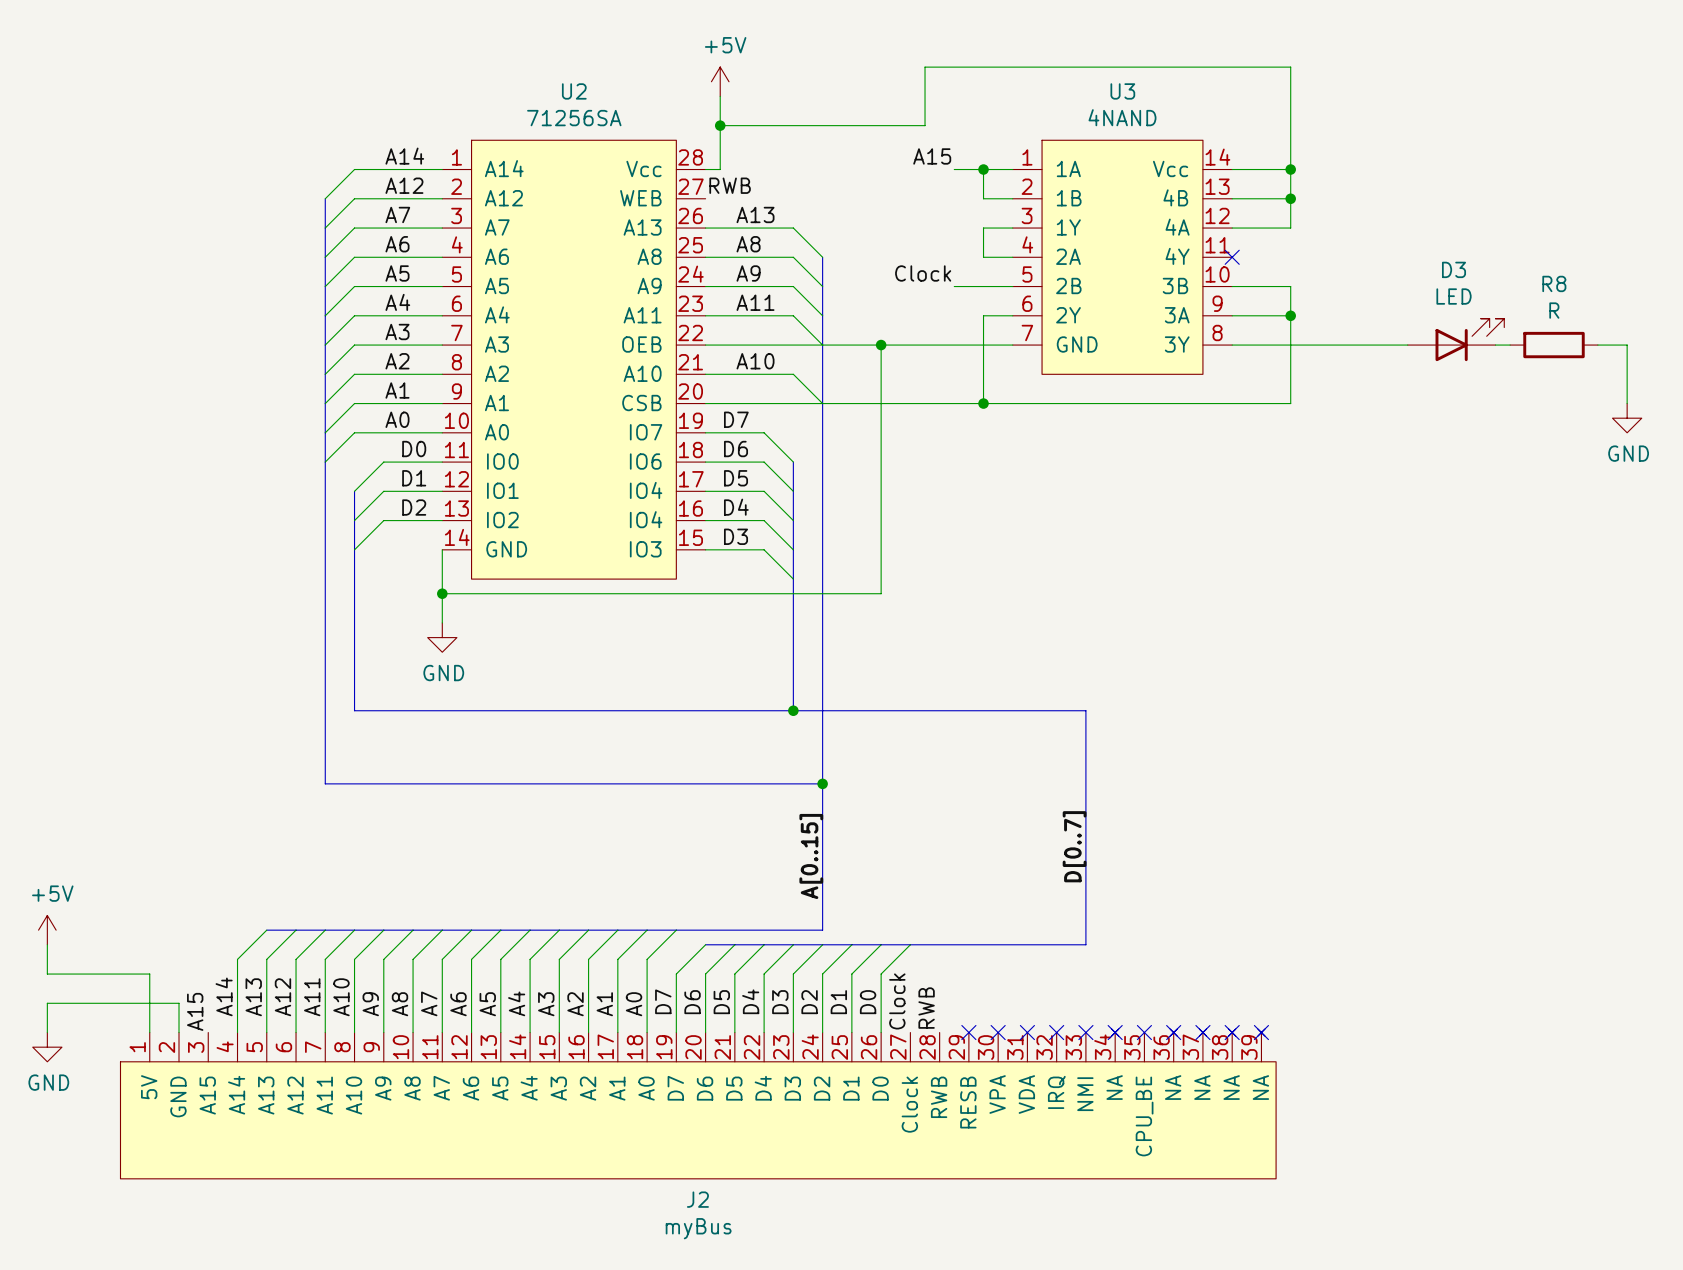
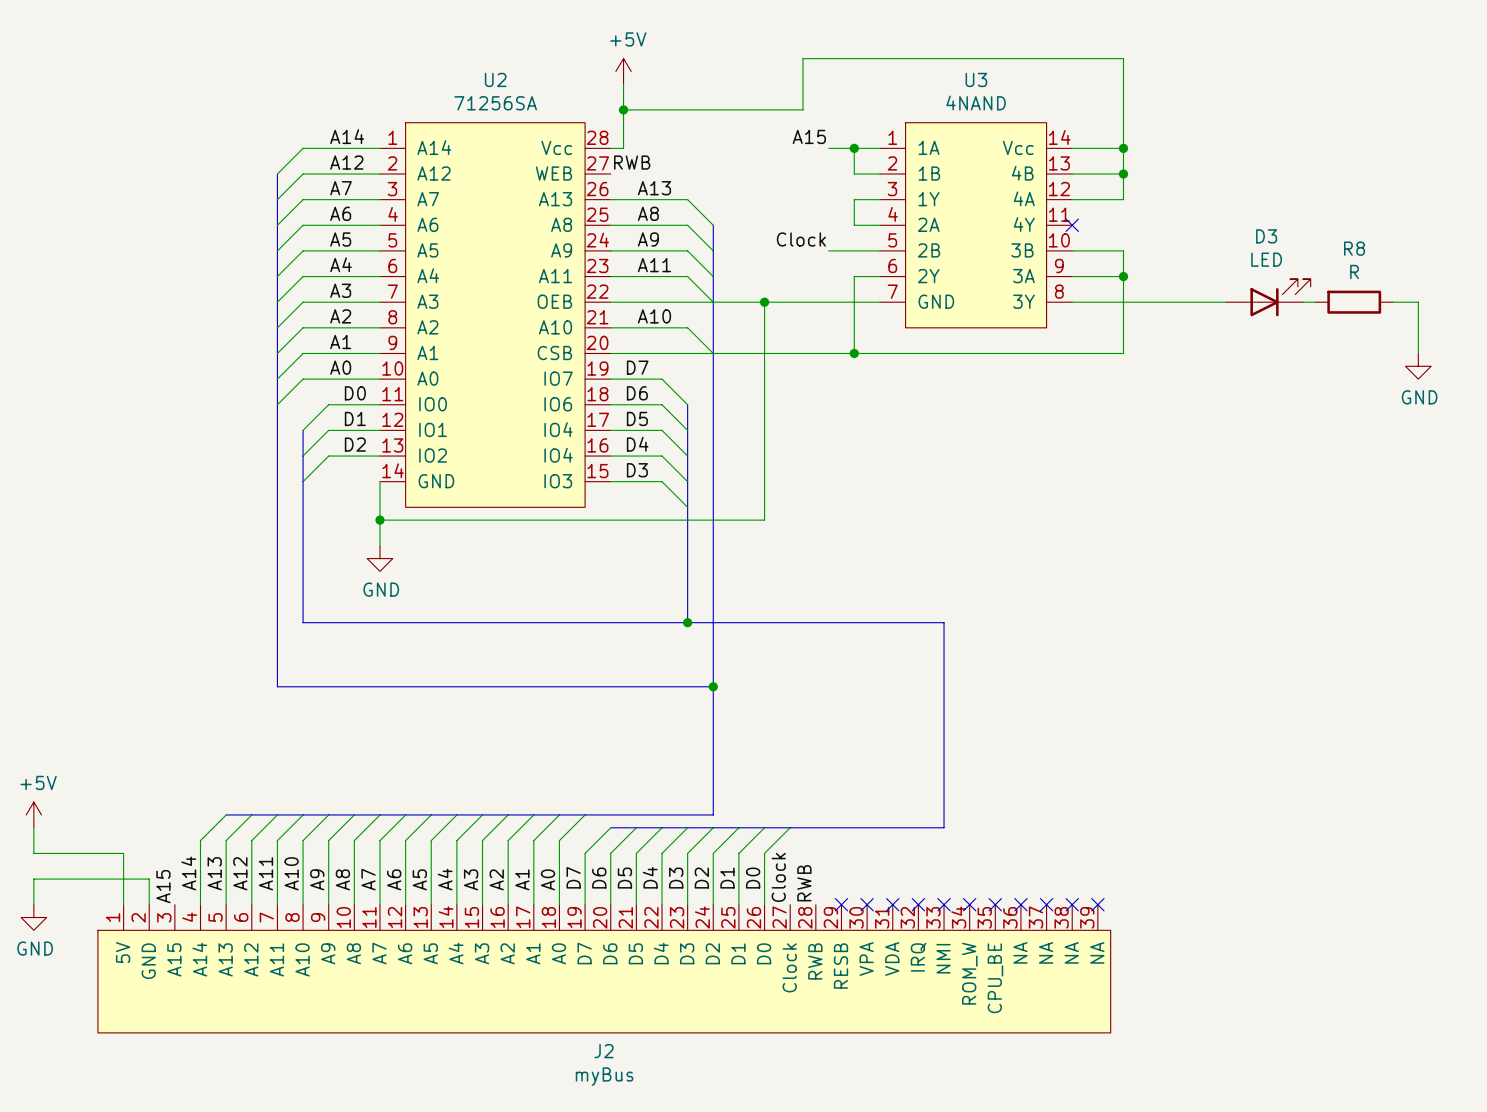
label: D[0..7] (1074, 846) -> none
label: A[0..15] (811, 856) -> none
J2 symbol: [120, 1029, 1277, 1179] -> [97, 904, 1111, 1033]

